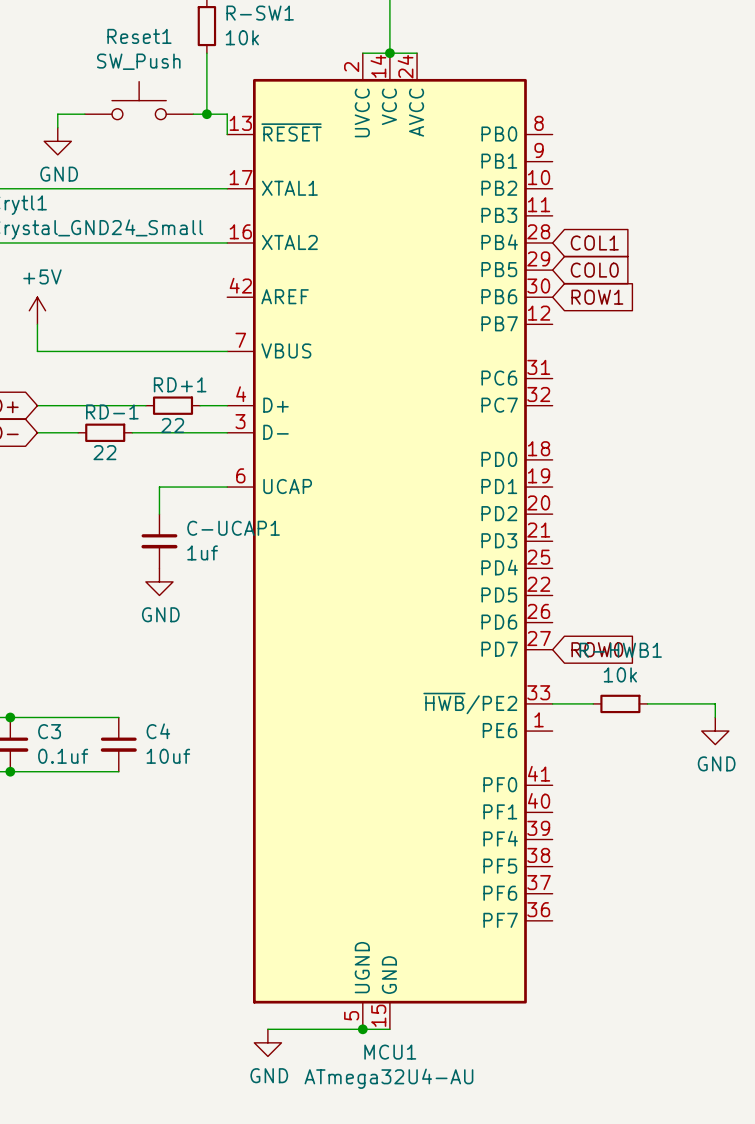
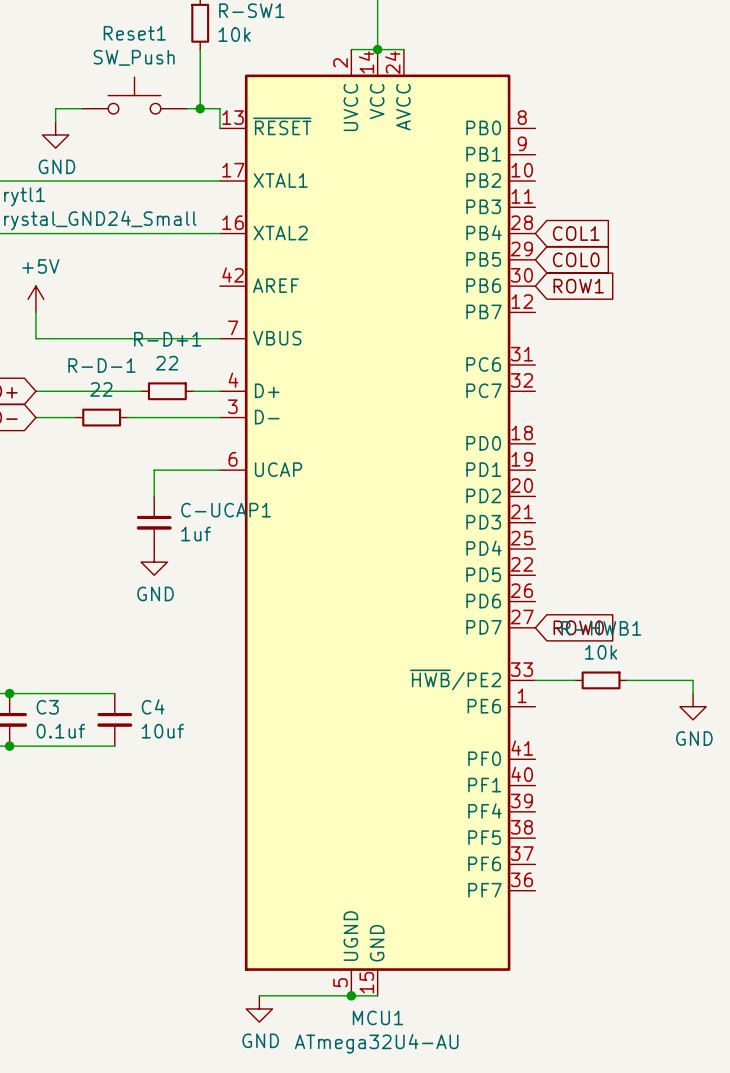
RD+1 name: RD+1 (180, 384) -> R-D+1 (167, 339)
RD-1 name: RD-1 (112, 411) -> R-D-1 (101, 365)
RD+1 value position: 22 (172, 425) -> 22 (167, 363)
RD-1 value position: 22 (104, 452) -> 22 (101, 389)

